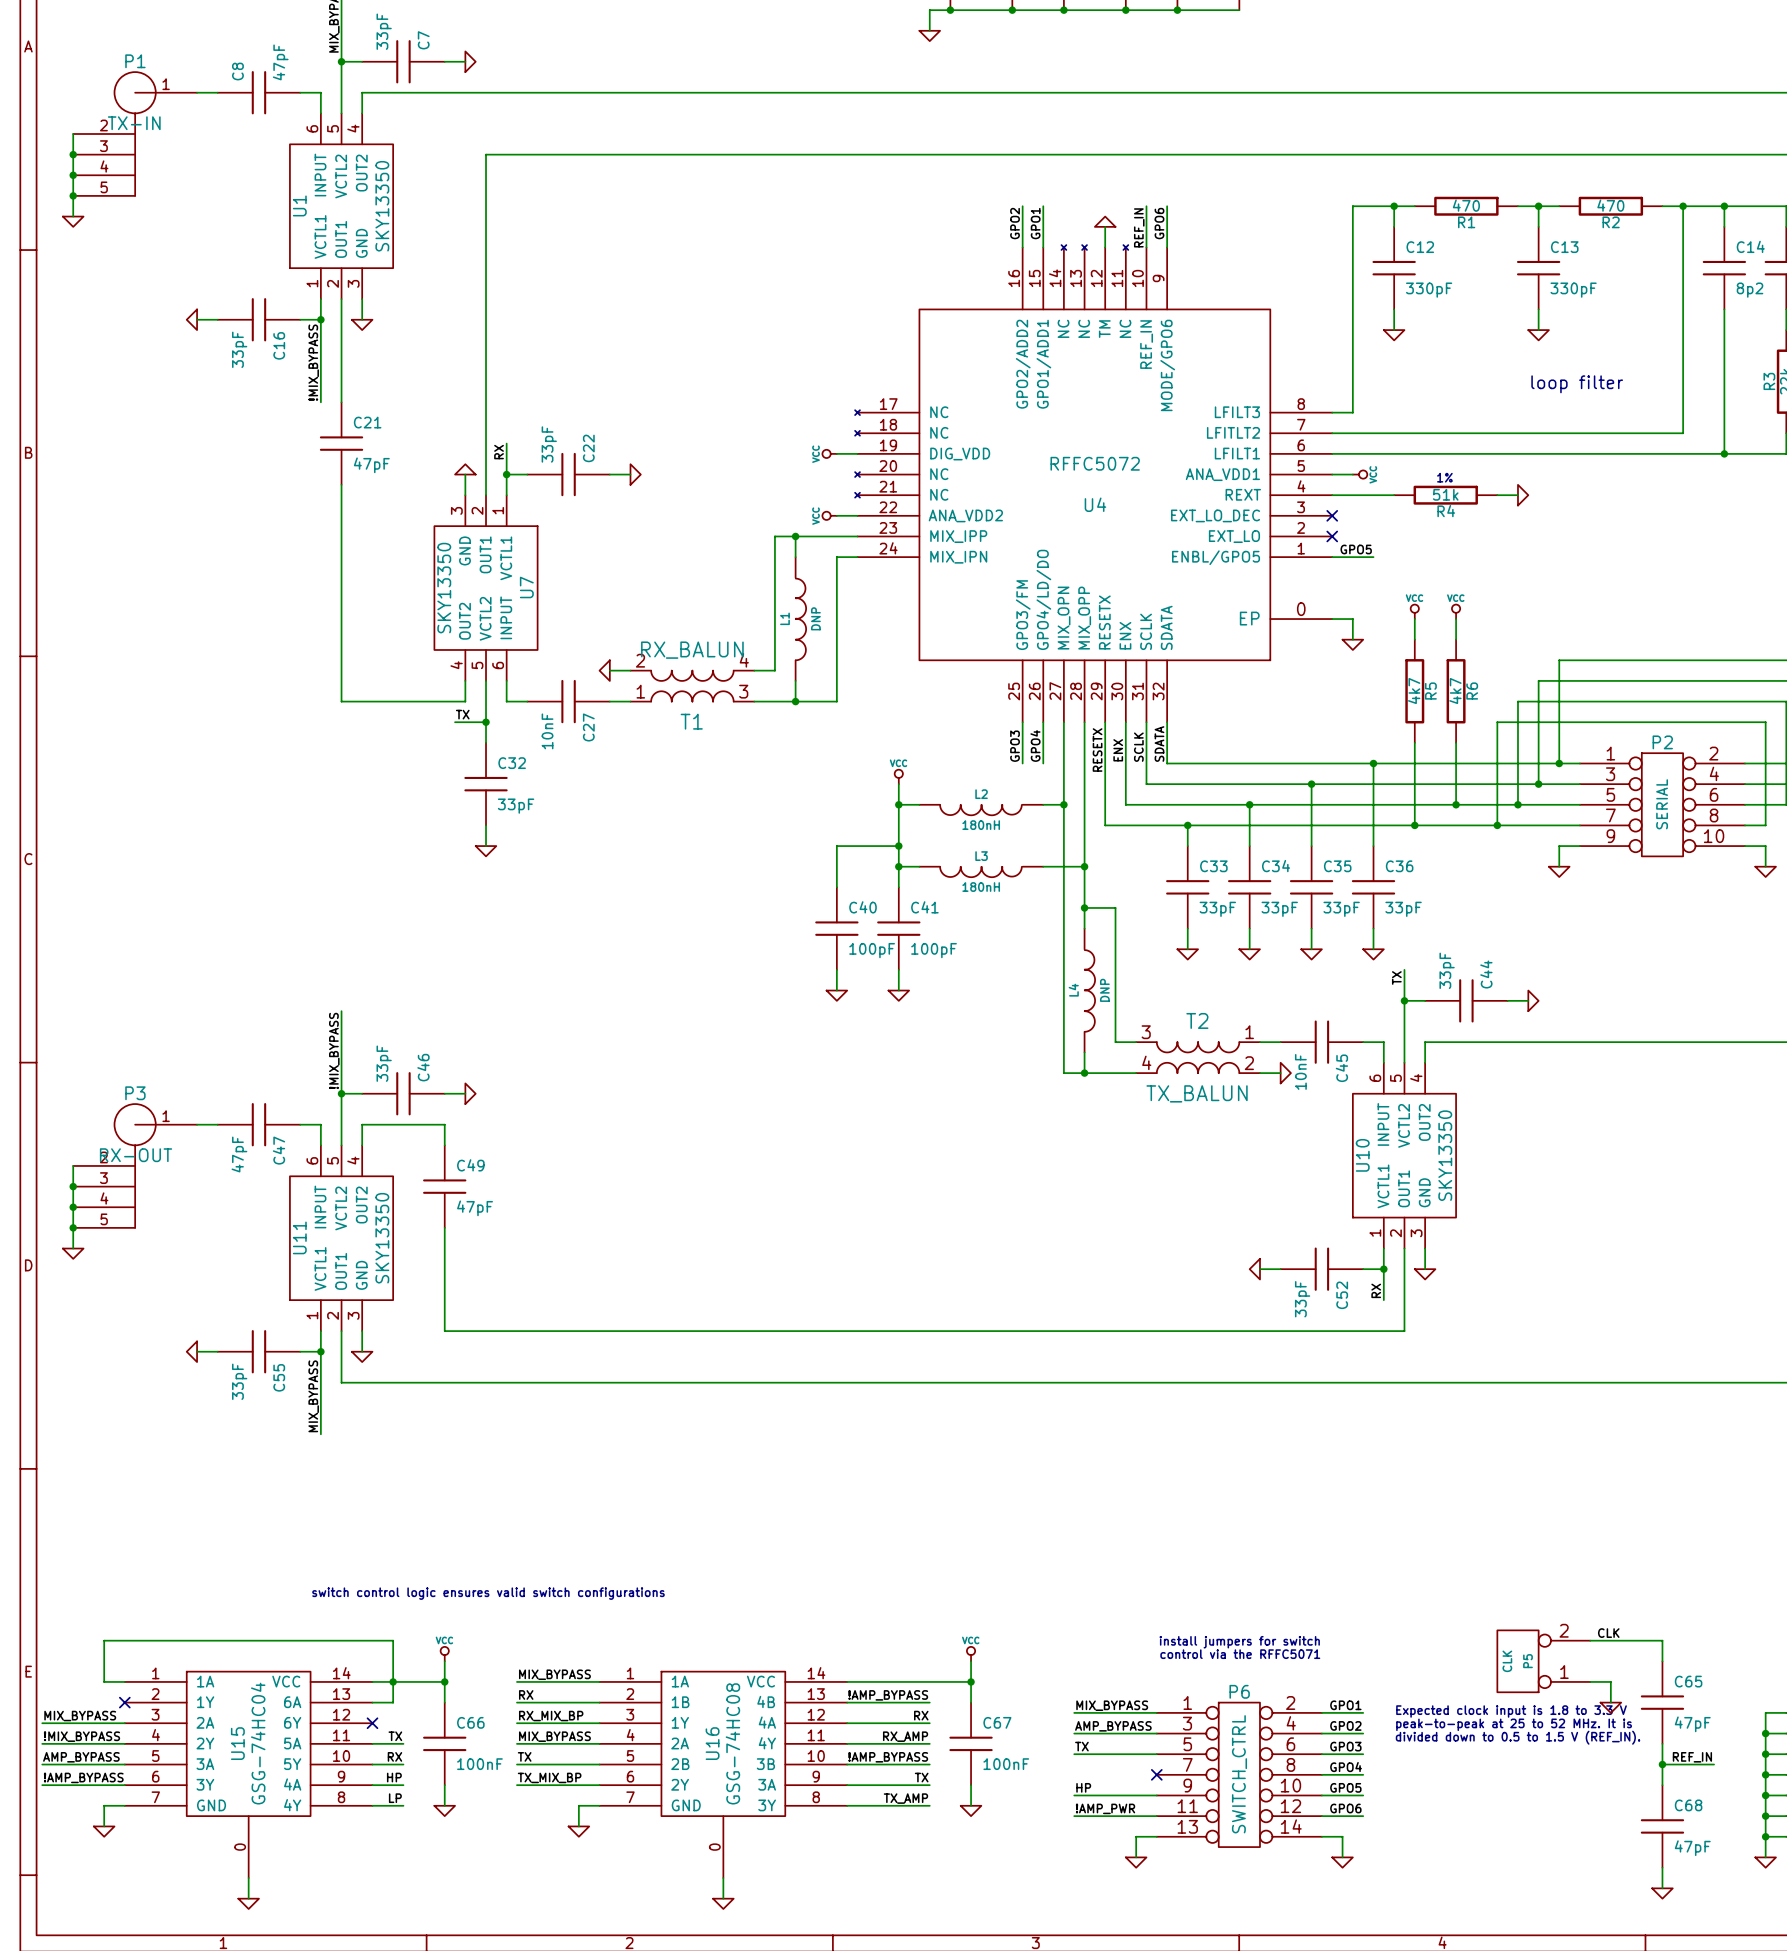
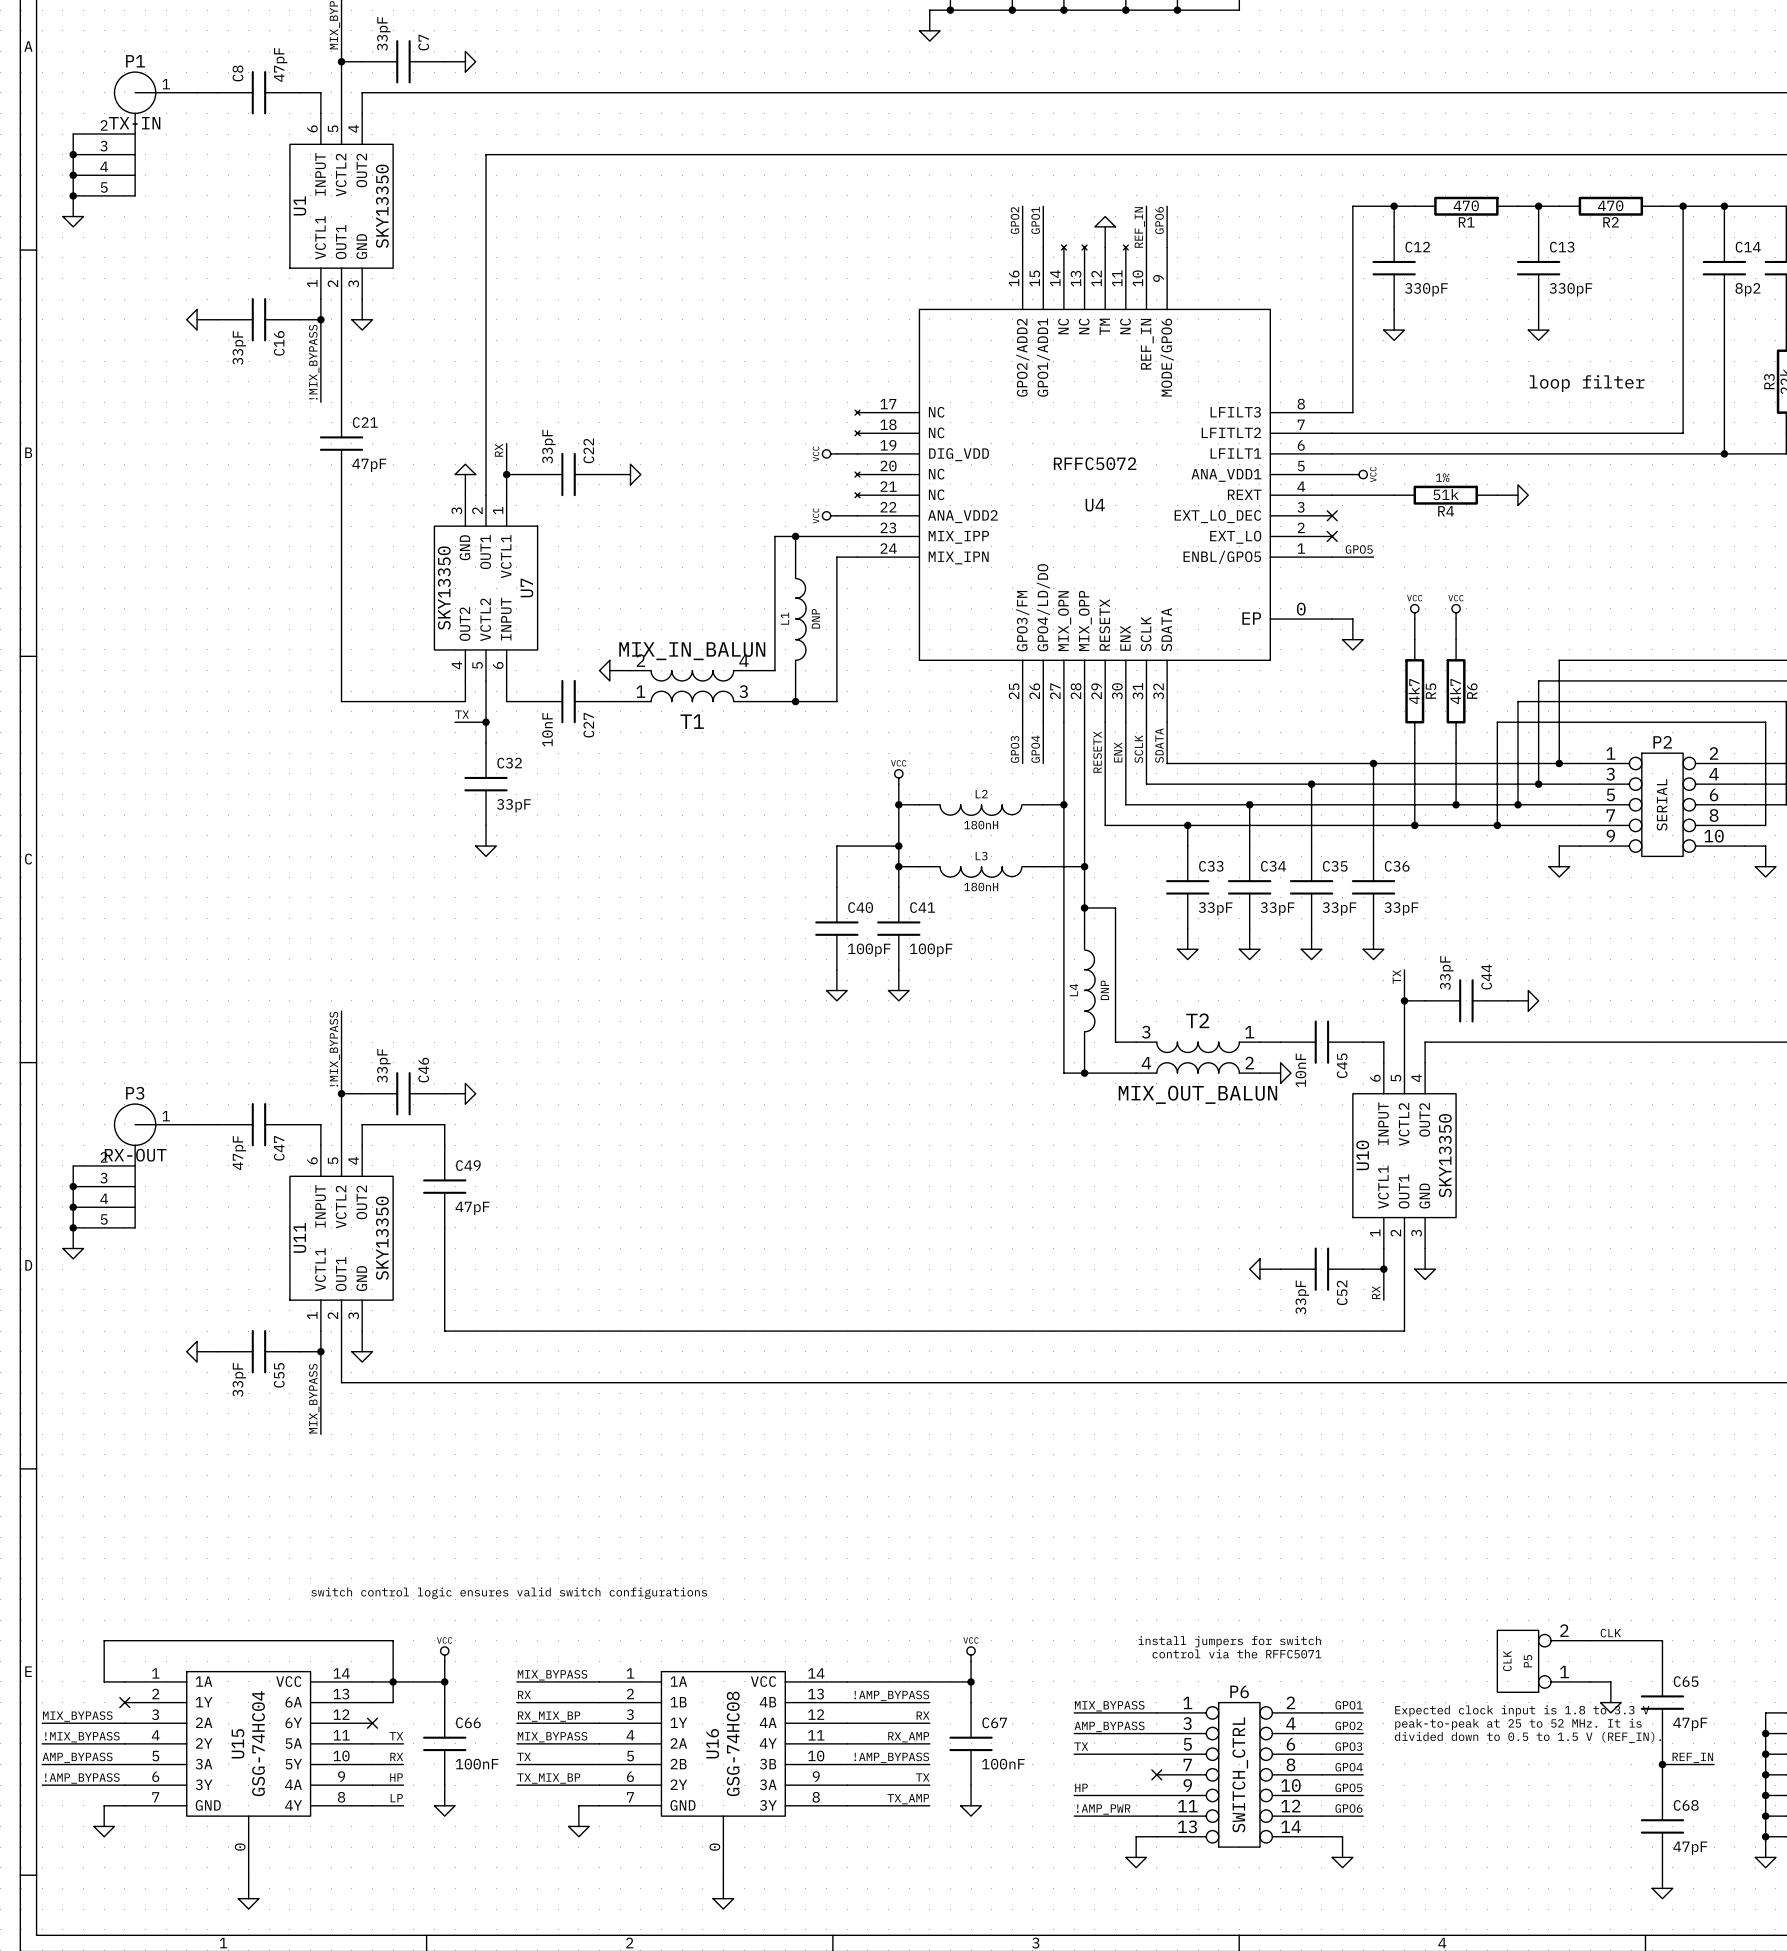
T1 value: RX_BALUN (692, 650) -> MIX_IN_BALUN (692, 651)
T2 value: TX_BALUN (1197, 1093) -> MIX_OUT_BALUN (1197, 1094)

